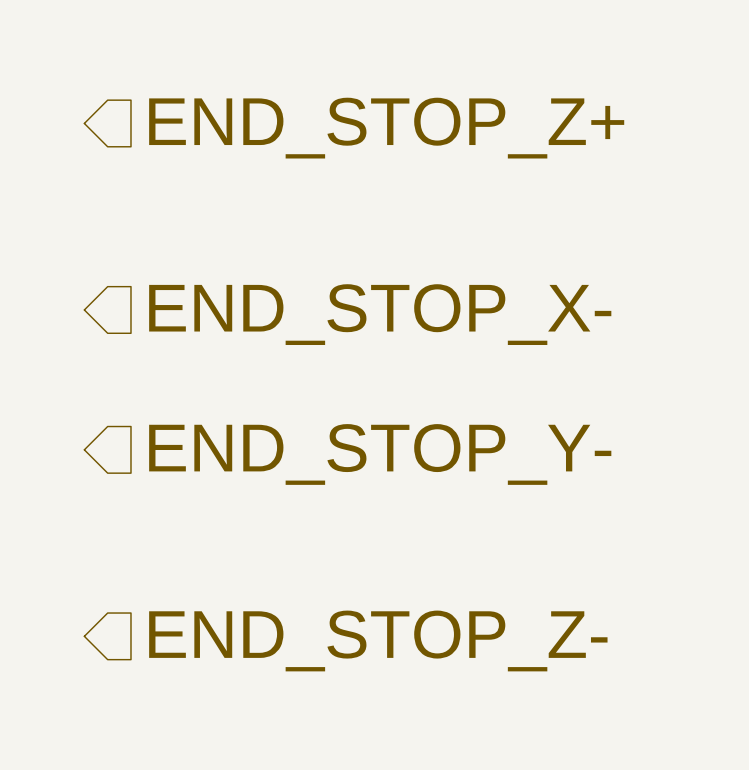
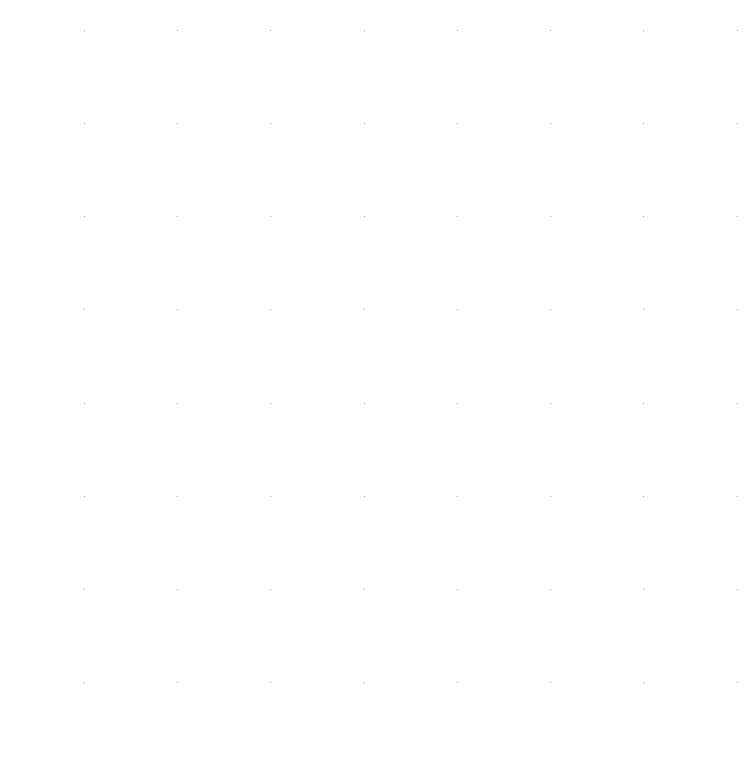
hierarchical label: END_STOP_Z+ (386, 128) -> none
hierarchical label: END_STOP_X- (380, 314) -> none
hierarchical label: END_STOP_Y- (380, 454) -> none
hierarchical label: END_STOP_Z- (378, 640) -> none

